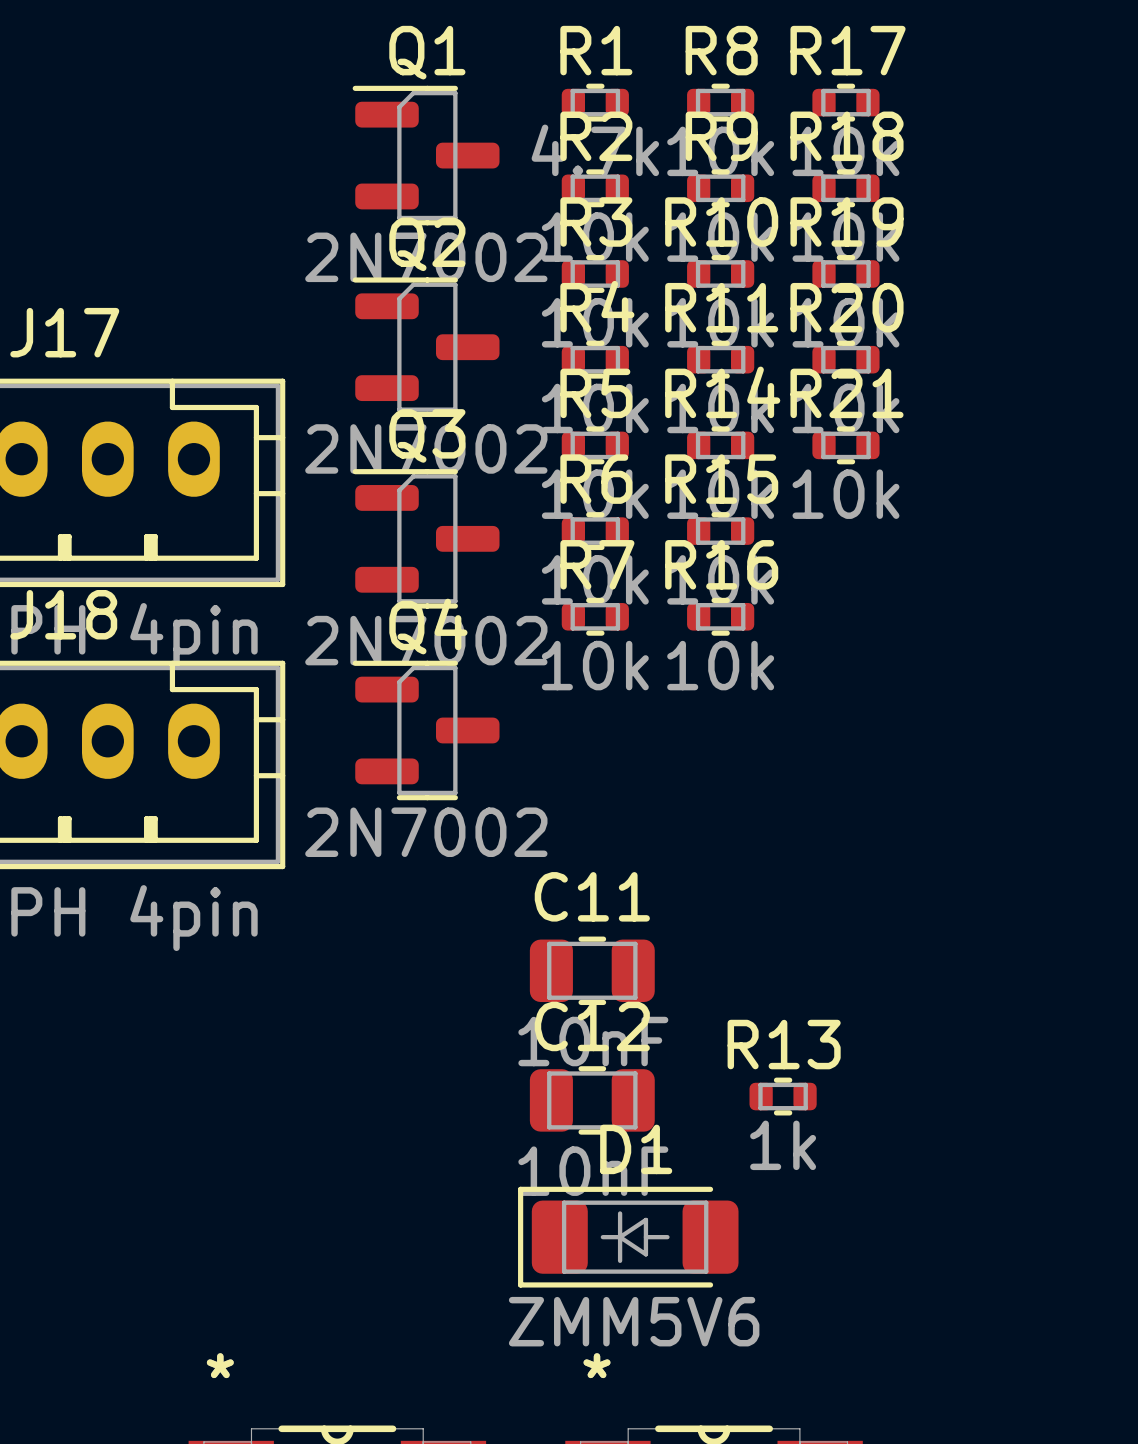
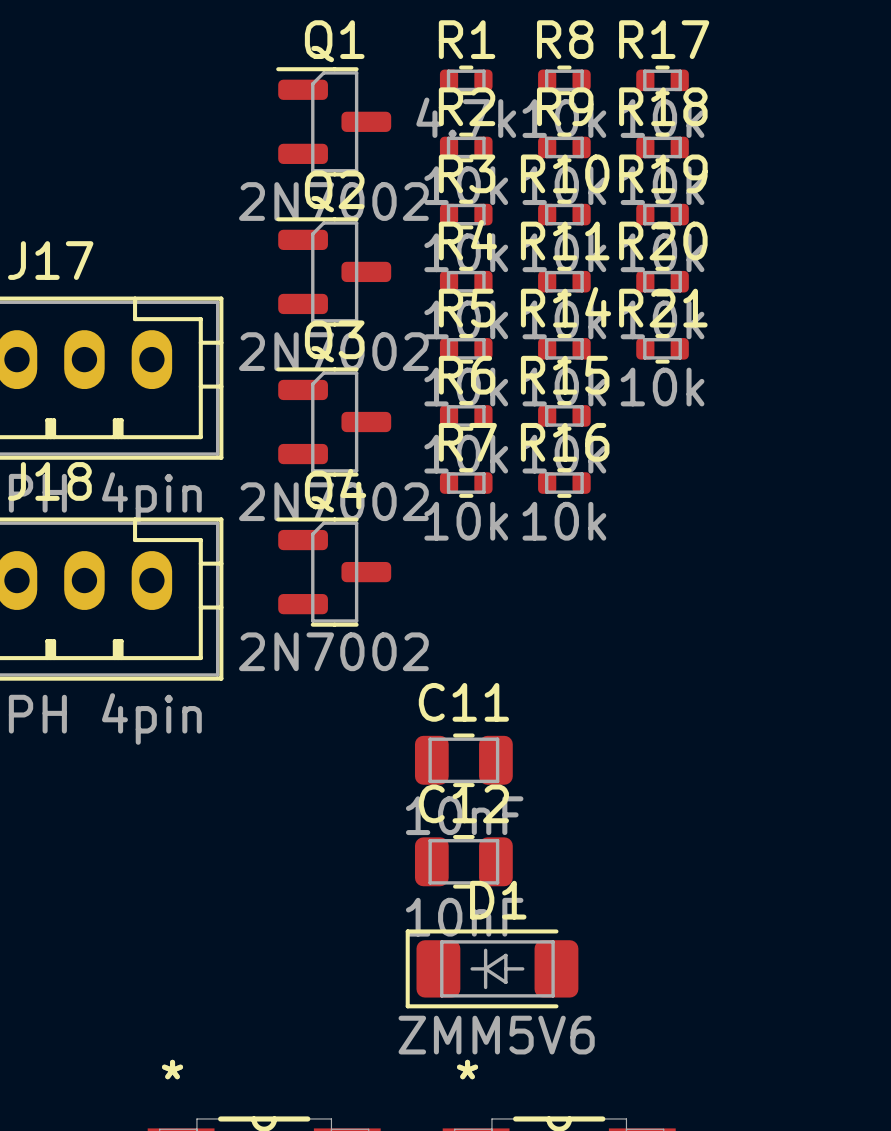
R13: 1k (783, 1096) -> none

